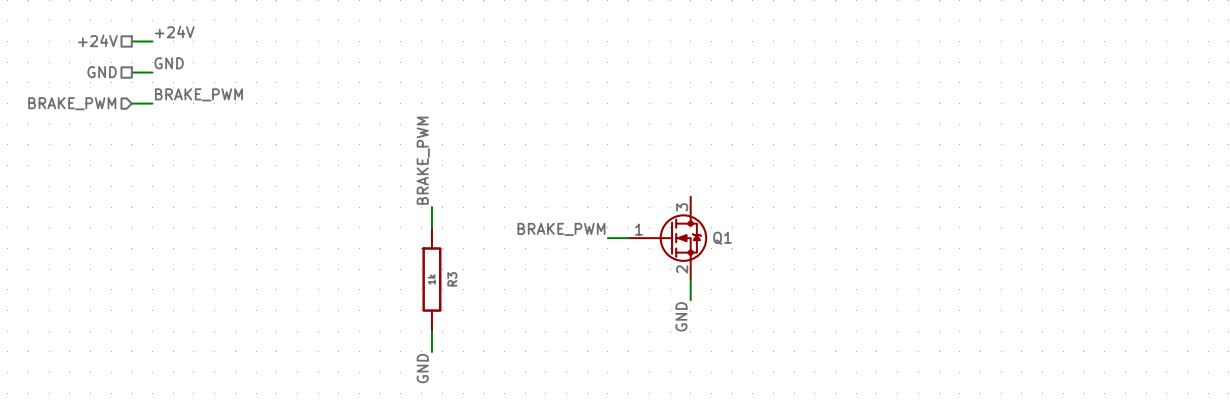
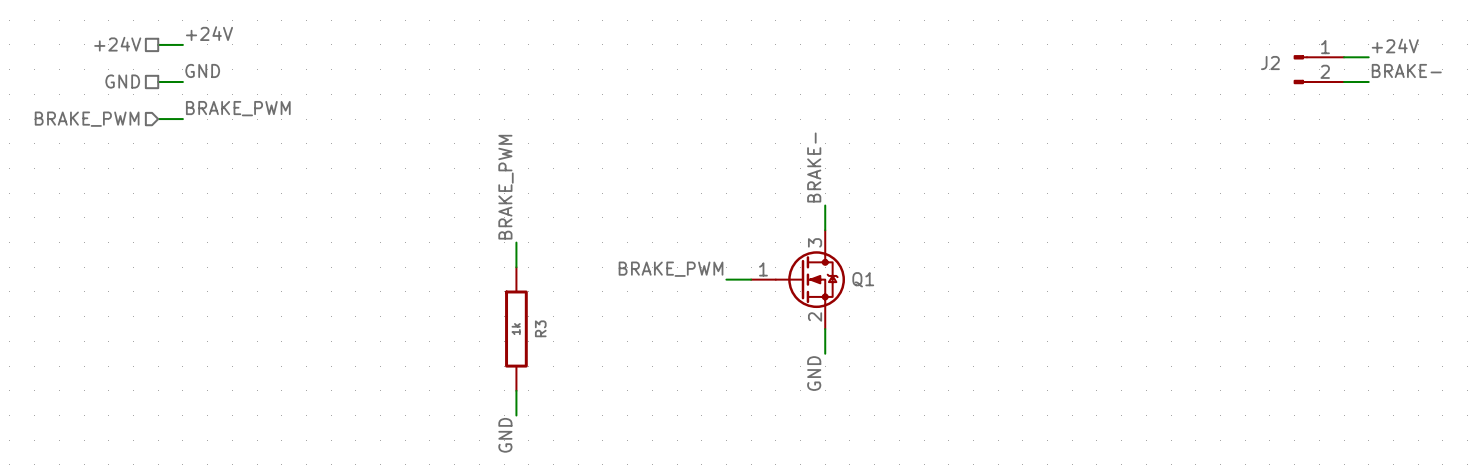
label: none -> +24V (1395, 45)
wire: none -> (1344, 57) (1368, 57)
J2: none -> (1318, 69)
label: none -> BRAKE- (1406, 70)
wire: none -> (1344, 82) (1368, 82)
label: none -> BRAKE- (814, 167)
wire: none -> (825, 205) (825, 230)

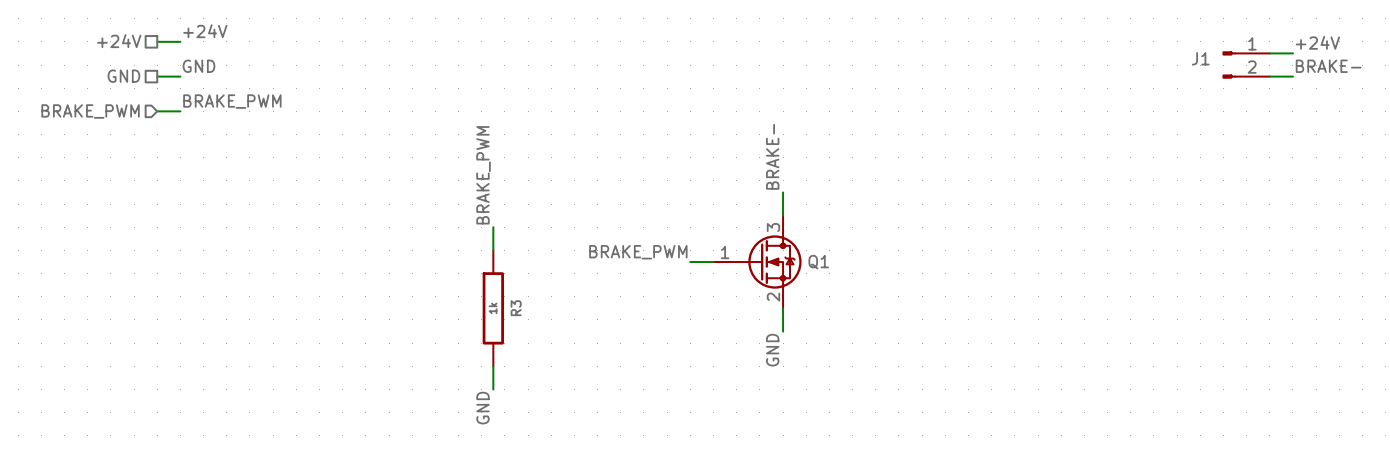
J2 name: J2 (1270, 63) -> J1 (1200, 58)

